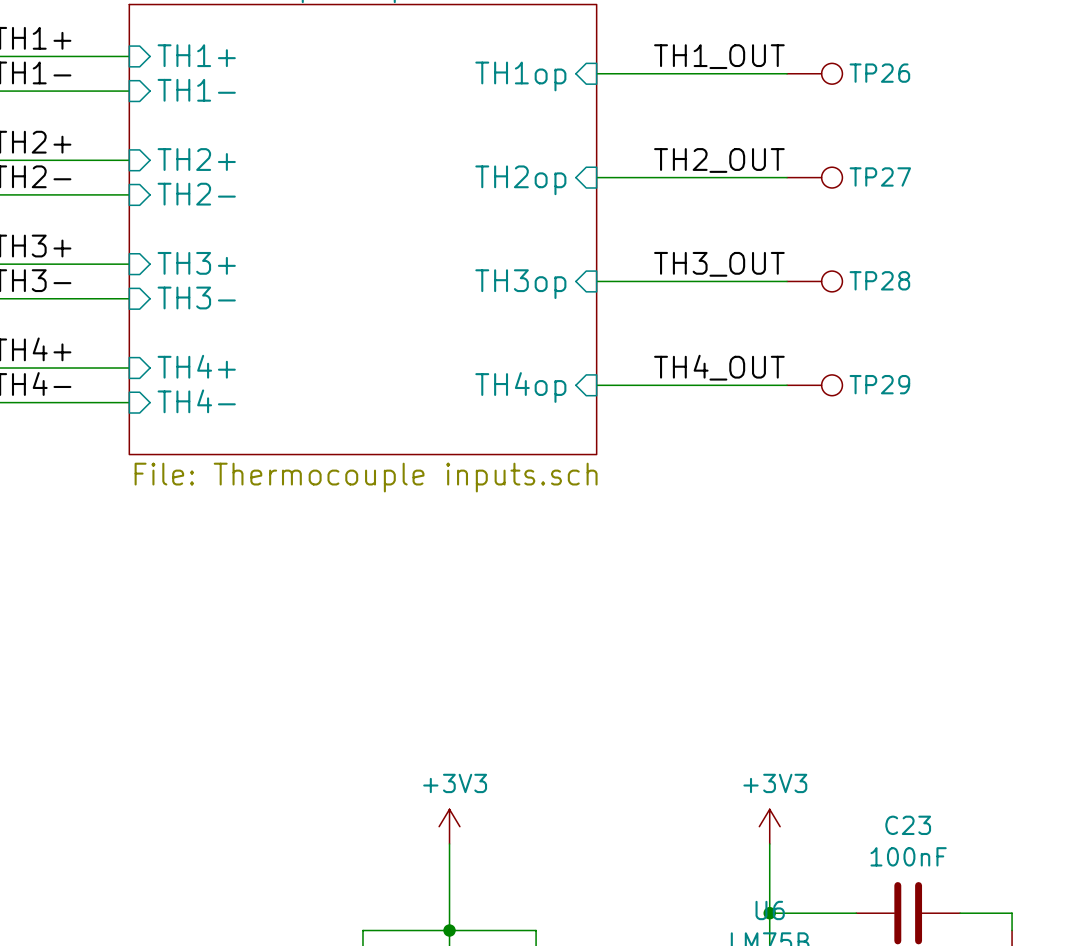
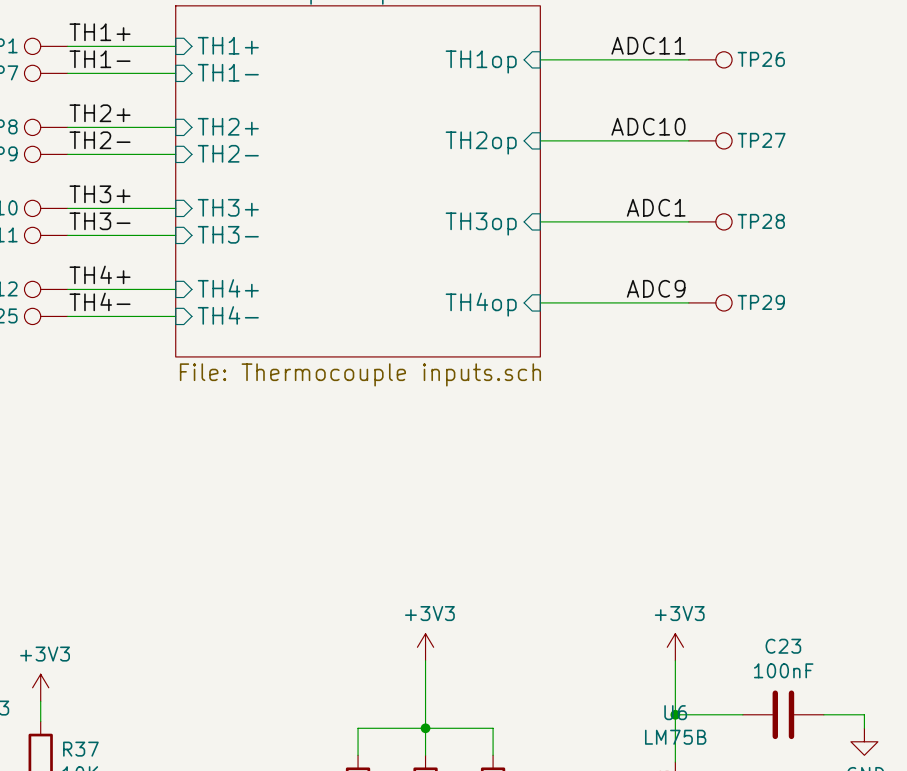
label: TH1_OUT (719, 56) -> ADC11 (648, 45)
label: TH2_OUT (719, 160) -> ADC10 (648, 126)
label: TH3_OUT (719, 264) -> ADC1 (656, 207)
label: TH4_OUT (719, 367) -> ADC9 (656, 288)

